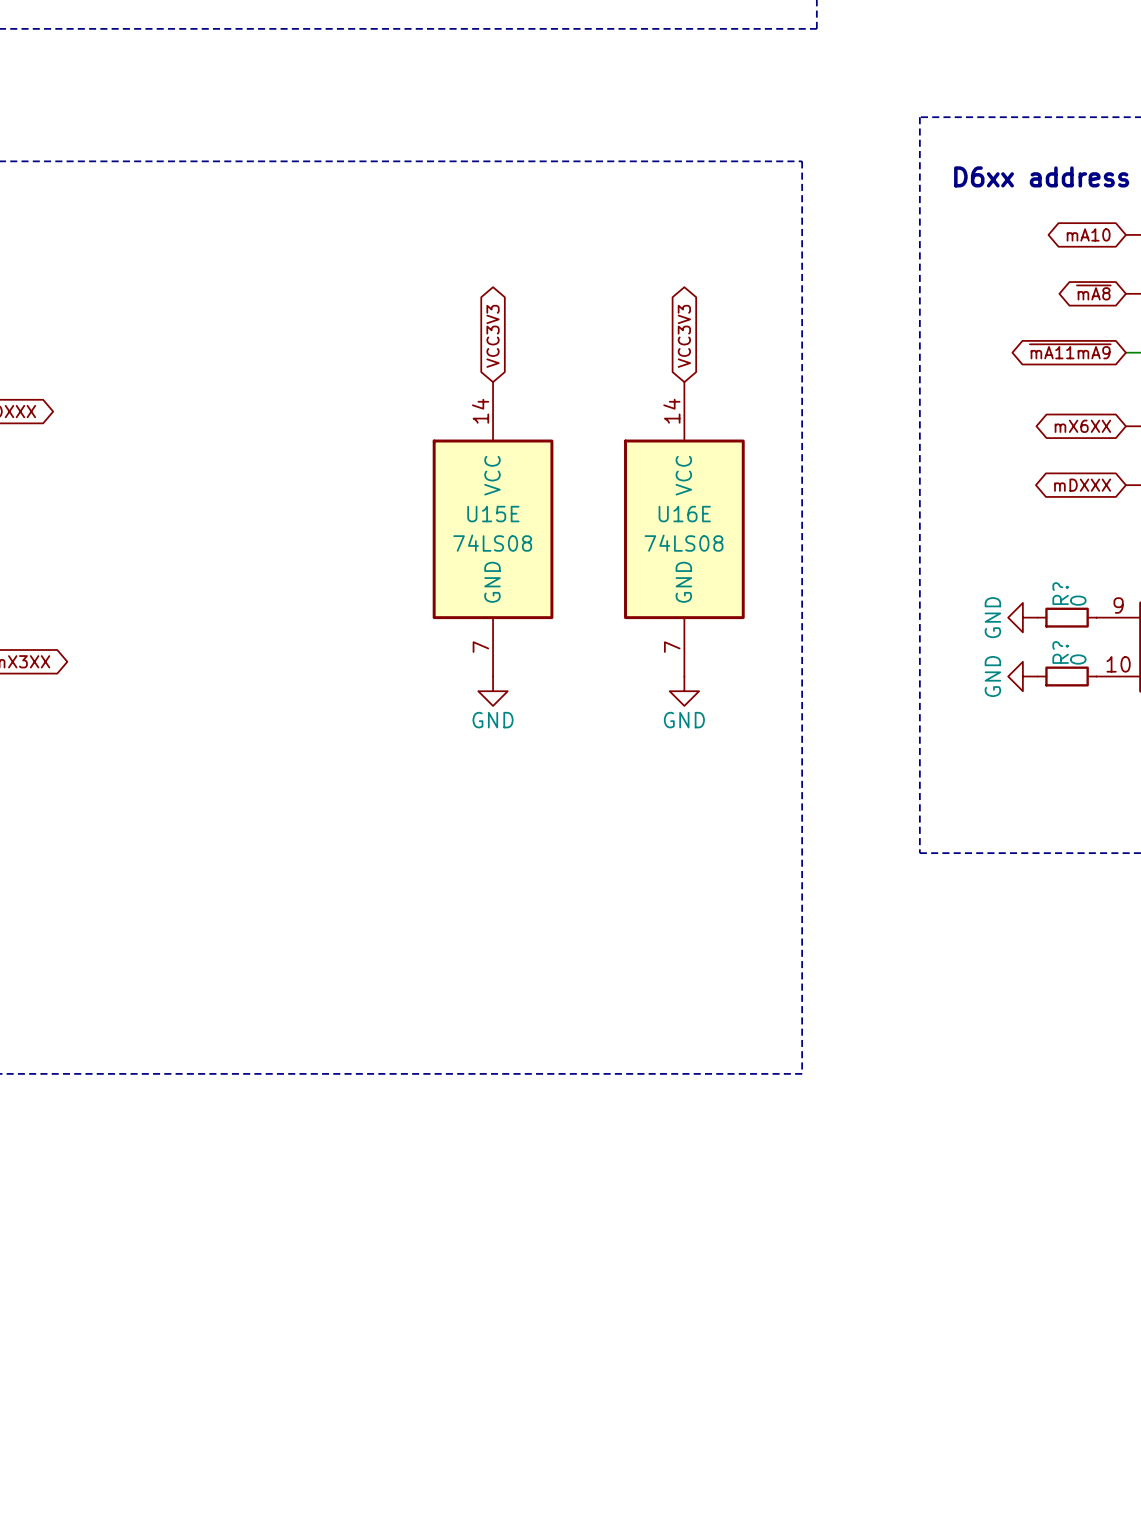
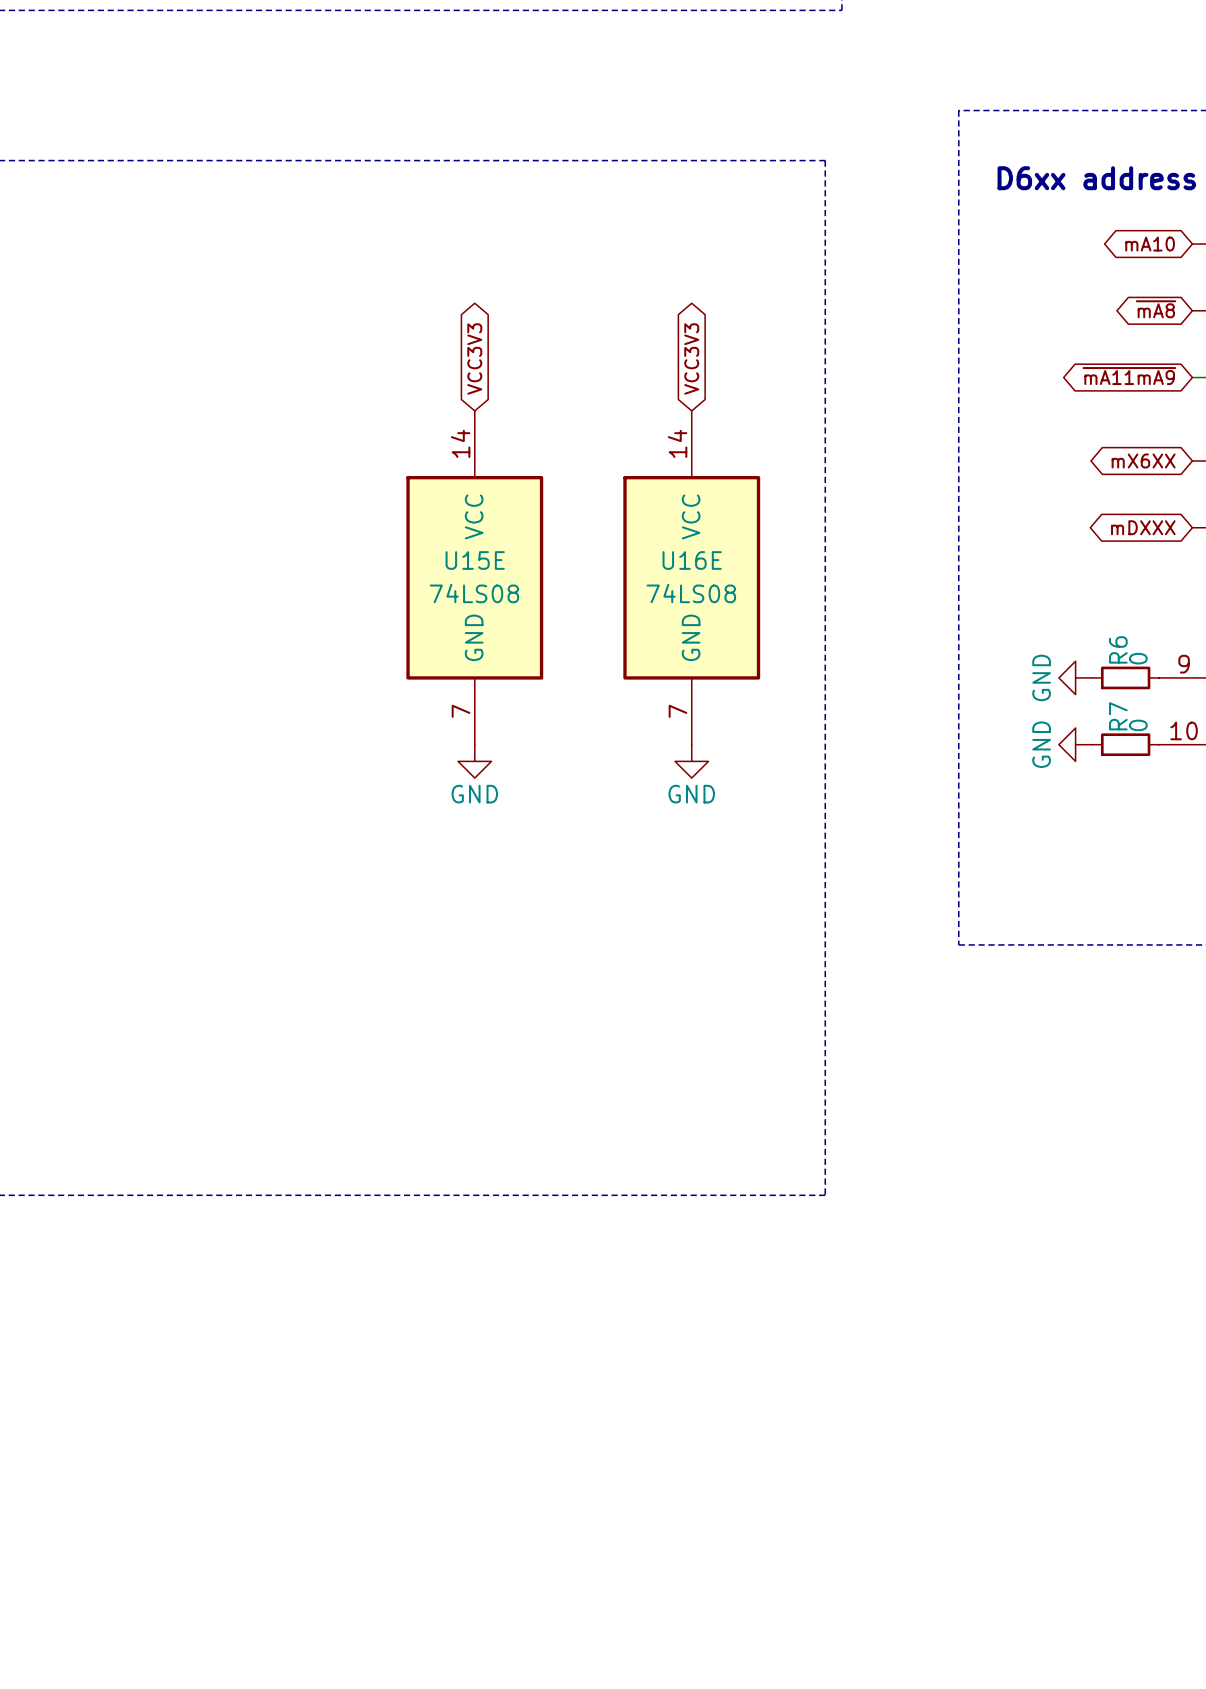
R? name: R? (1060, 593) -> R6 (1118, 649)
R? name: R? (1060, 652) -> R7 (1118, 716)

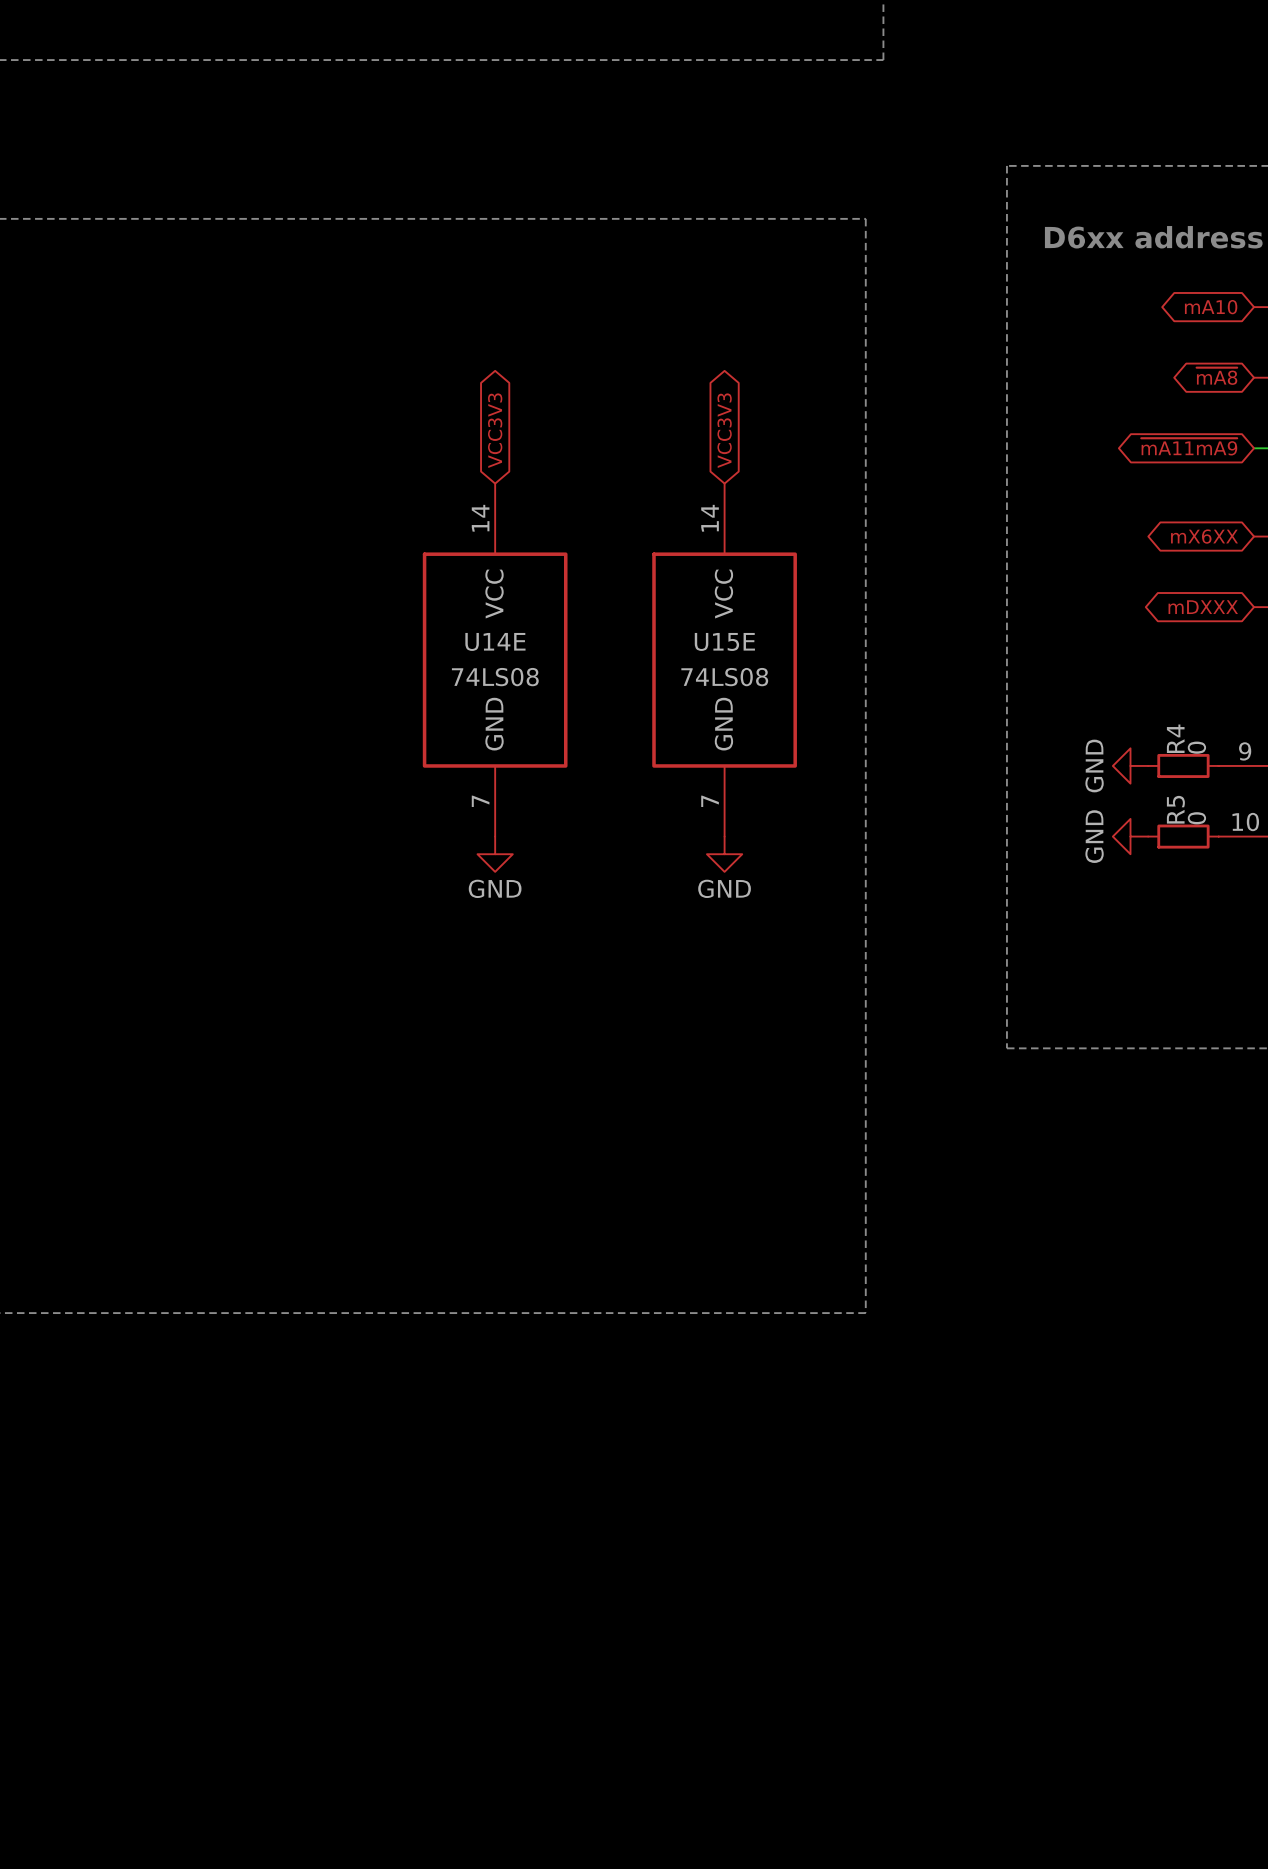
U15E name: U15E (475, 560) -> U14E (495, 641)
U16E name: U16E (692, 560) -> U15E (724, 641)
R6 name: R6 (1118, 649) -> R4 (1175, 738)
R7 name: R7 (1118, 716) -> R5 (1175, 809)

